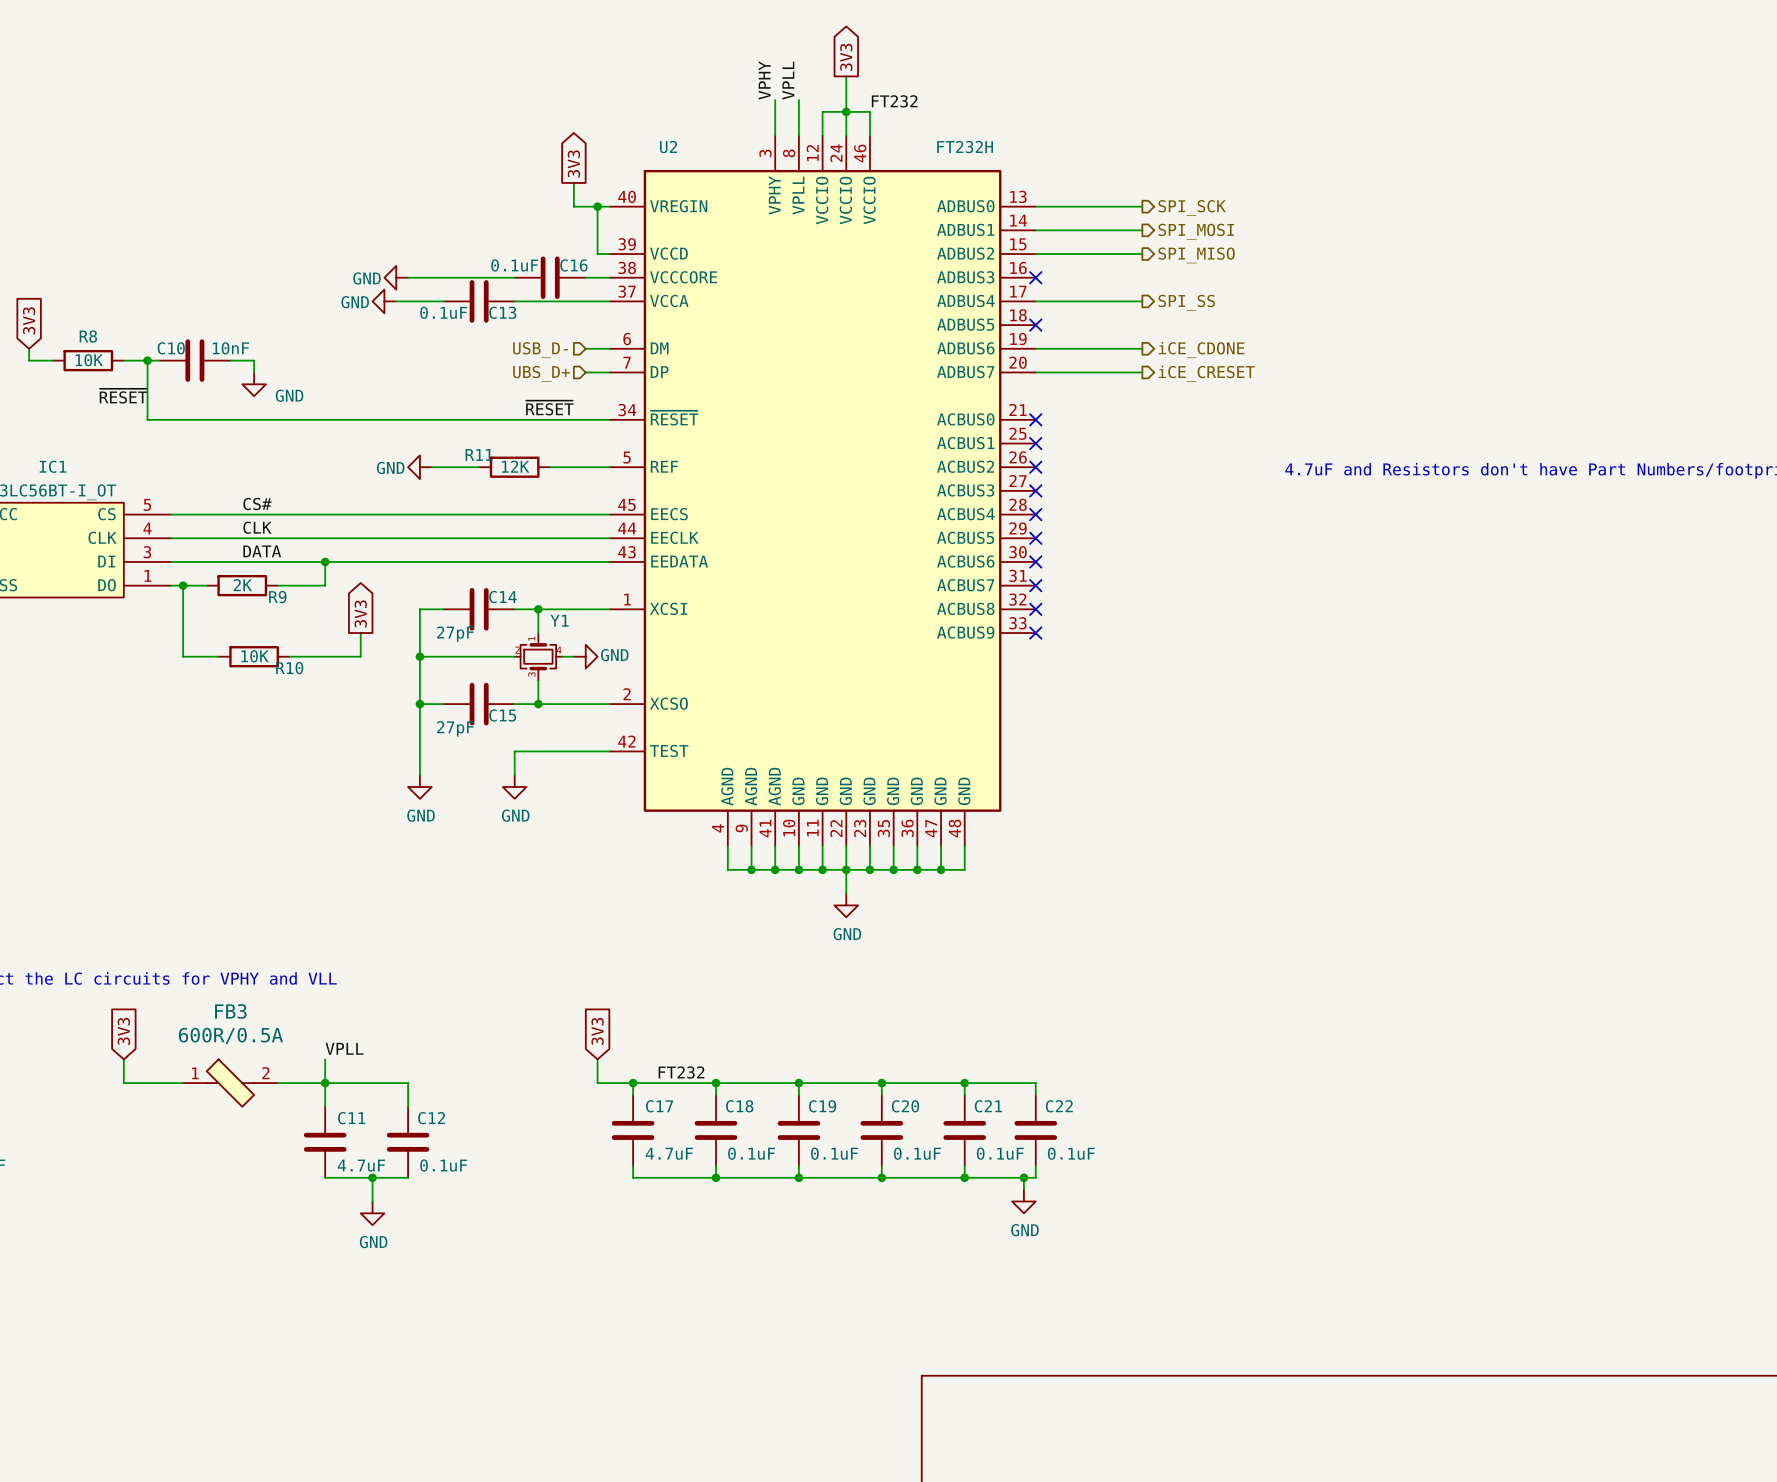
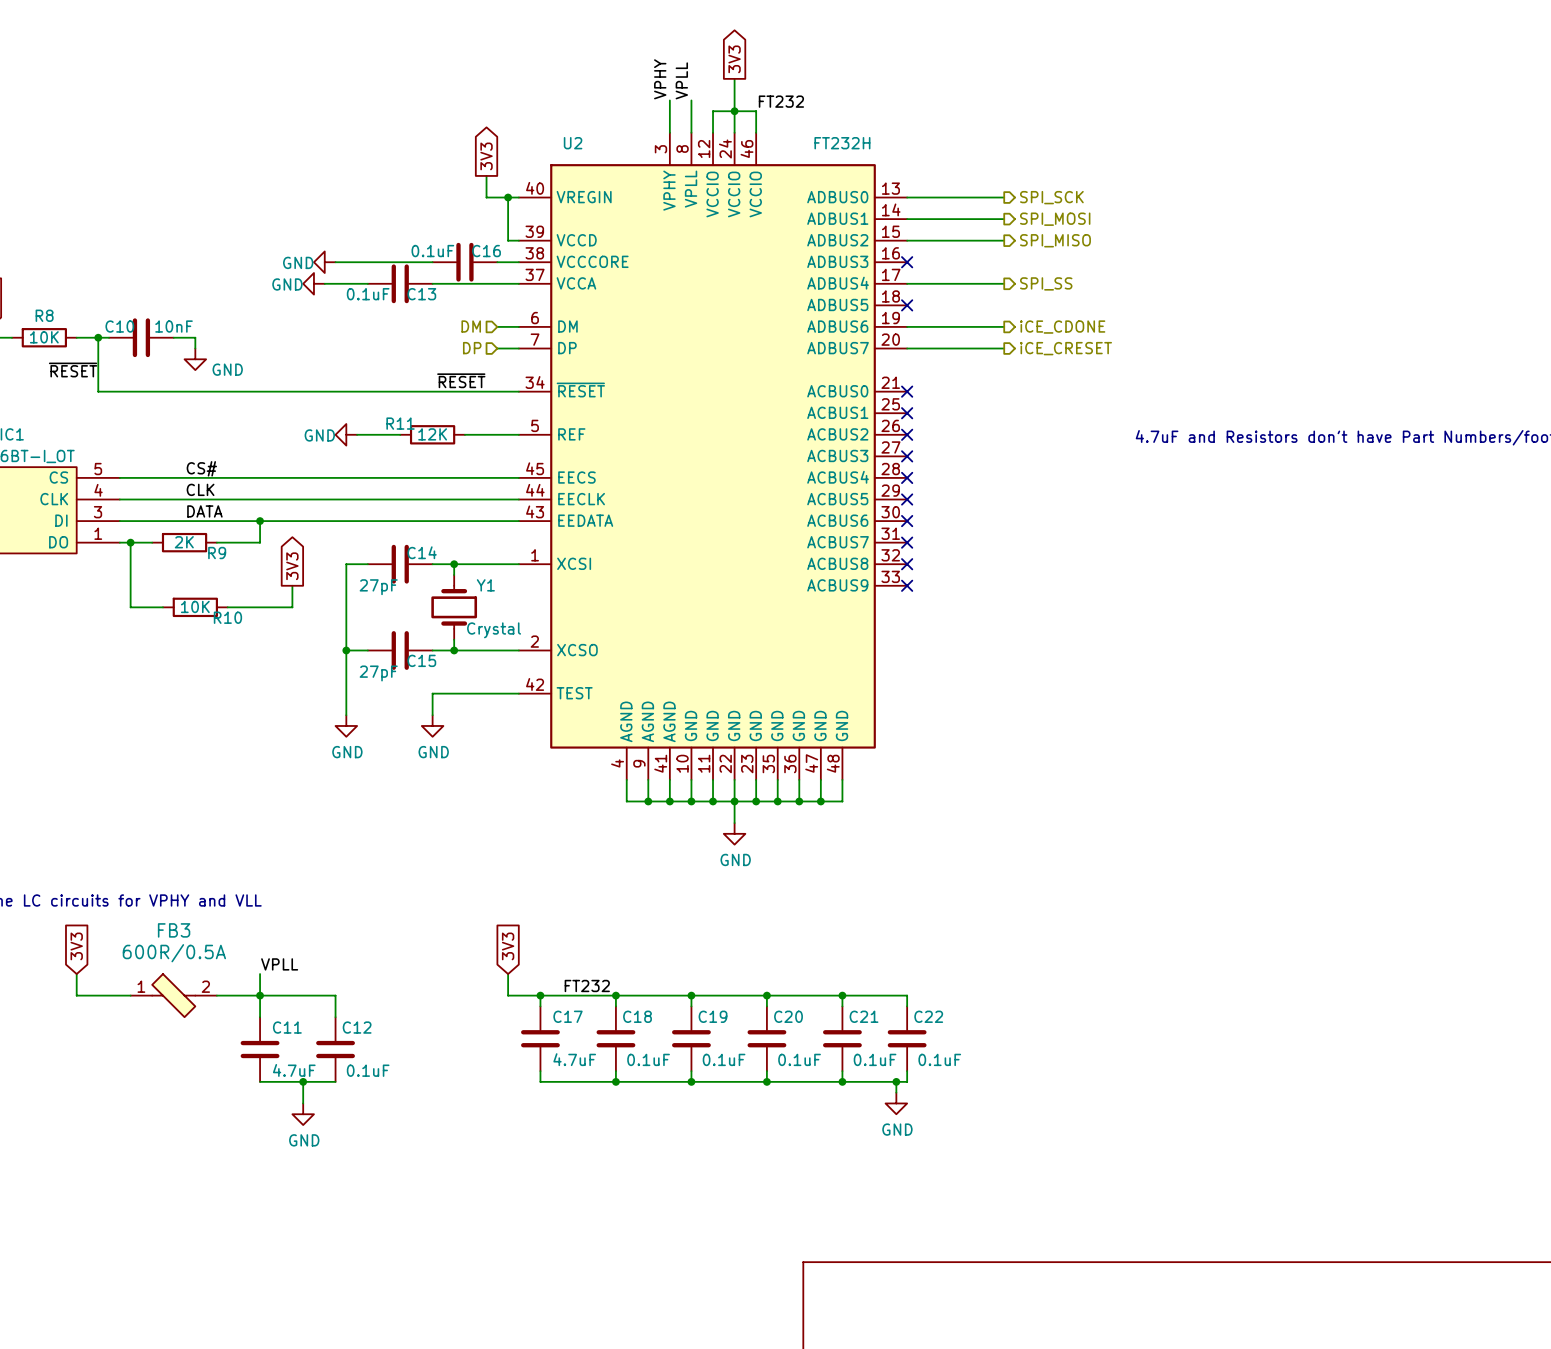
hierarchical label: USB_D- (540, 350) -> DM (471, 326)
hierarchical label: UBS_D+ (541, 373) -> DP (472, 348)
Y1 symbol: [514, 633, 563, 681] -> [431, 574, 478, 640]
wire: (419, 656) (514, 656) -> none
junction: (419, 656) -> none
wire: (562, 656) (573, 656) -> none
power symbol: GND (585, 656) -> none
Y1 value: none -> Crystal (494, 630)

